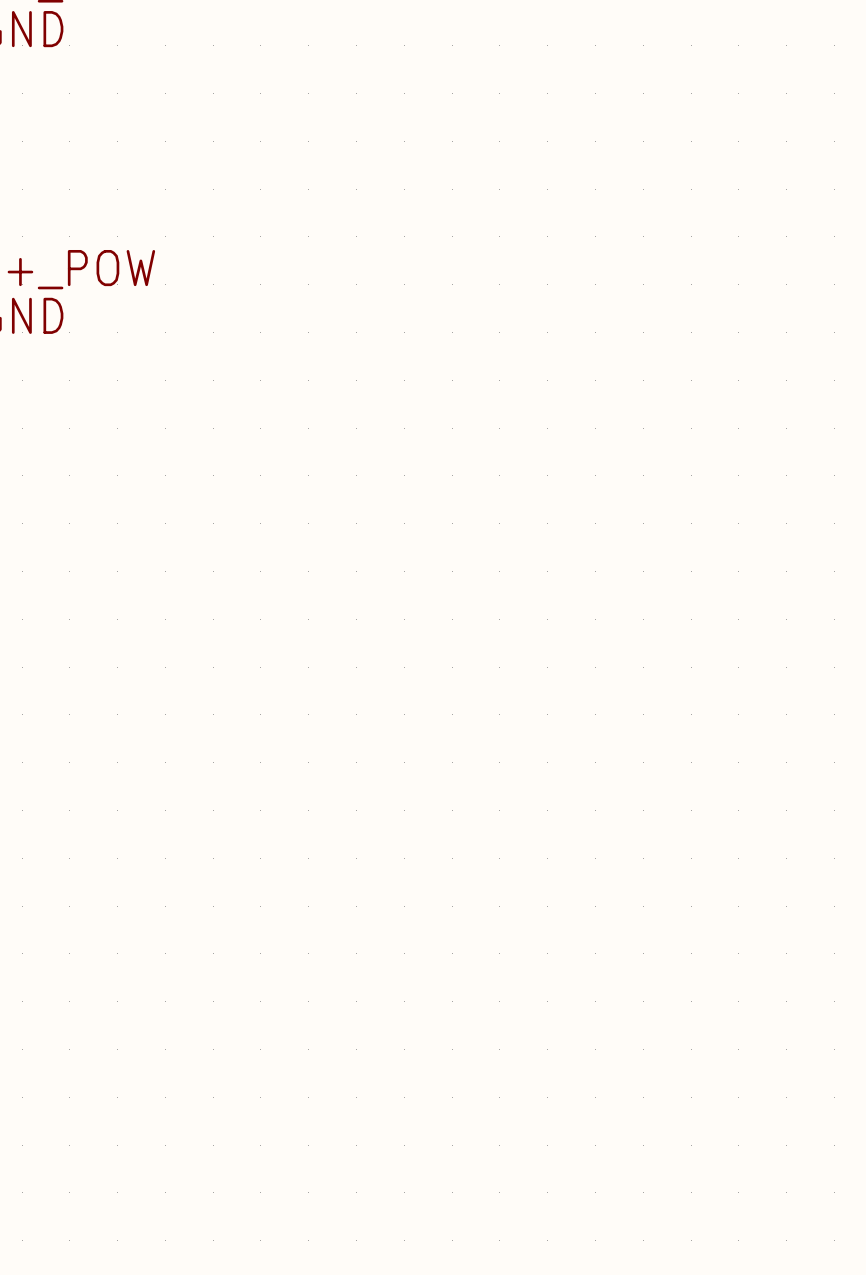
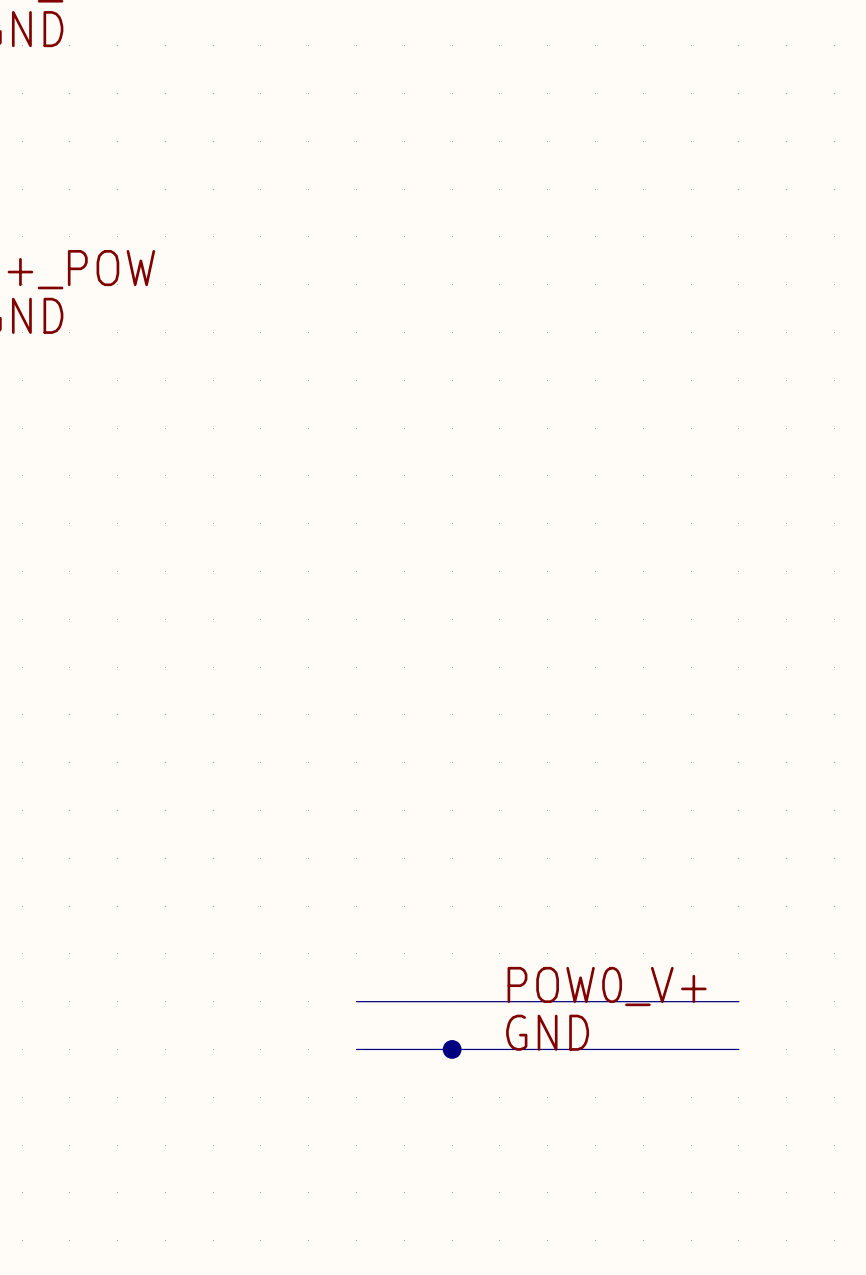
label: none -> POW0_V+ (607, 986)
wire: none -> (356, 1001) (738, 1001)
label: none -> GND (547, 1032)
wire: none -> (356, 1049) (738, 1049)
junction: none -> (452, 1049)

